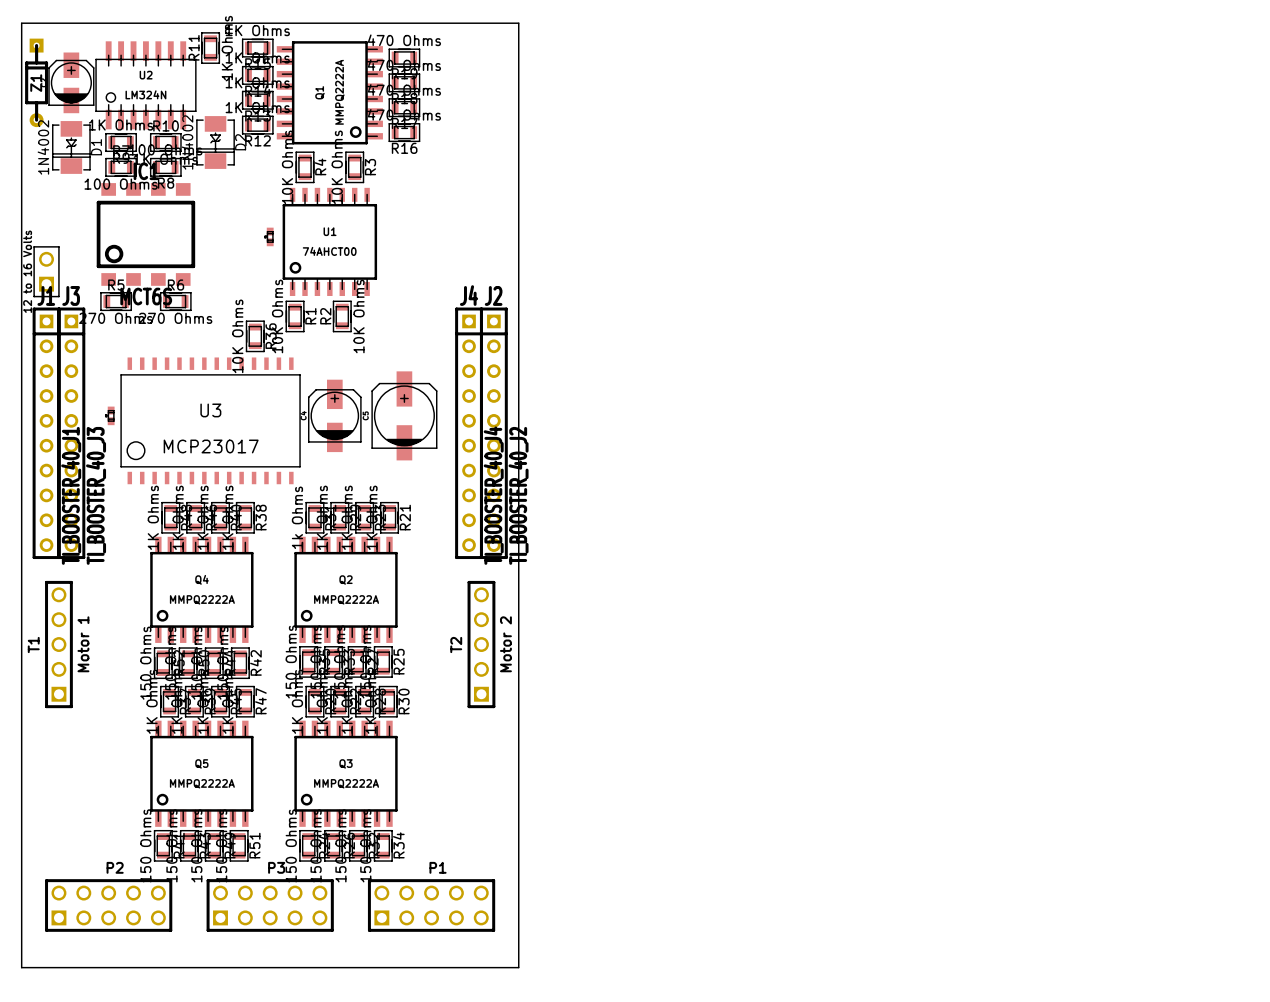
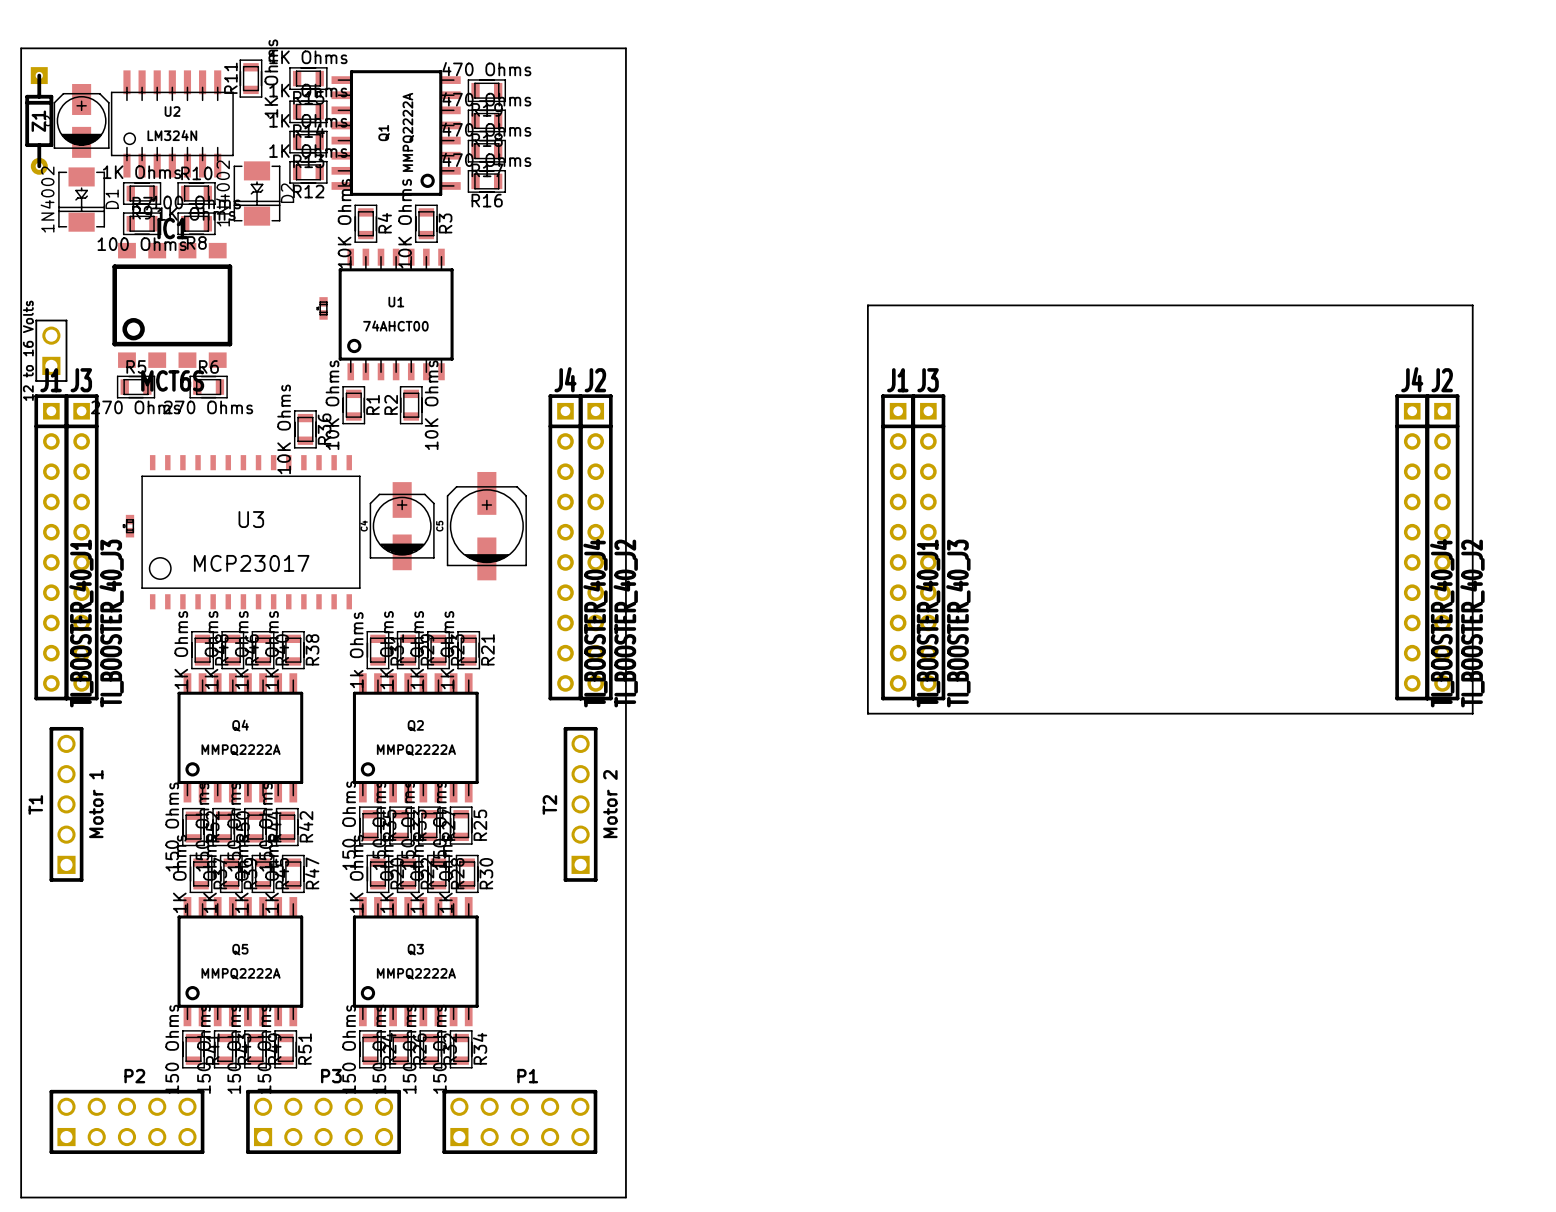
board edge: none -> (867, 305) (867, 713) (1472, 713) (1472, 305) (867, 305)
J1: none -> TI_BOOSTER_40_J1 (898, 547)
J3: none -> TI_BOOSTER_40_J3 (928, 547)
J4: none -> TI_BOOSTER_40_J4 (1412, 547)
J2: none -> TI_BOOSTER_40_J2 (1442, 547)

